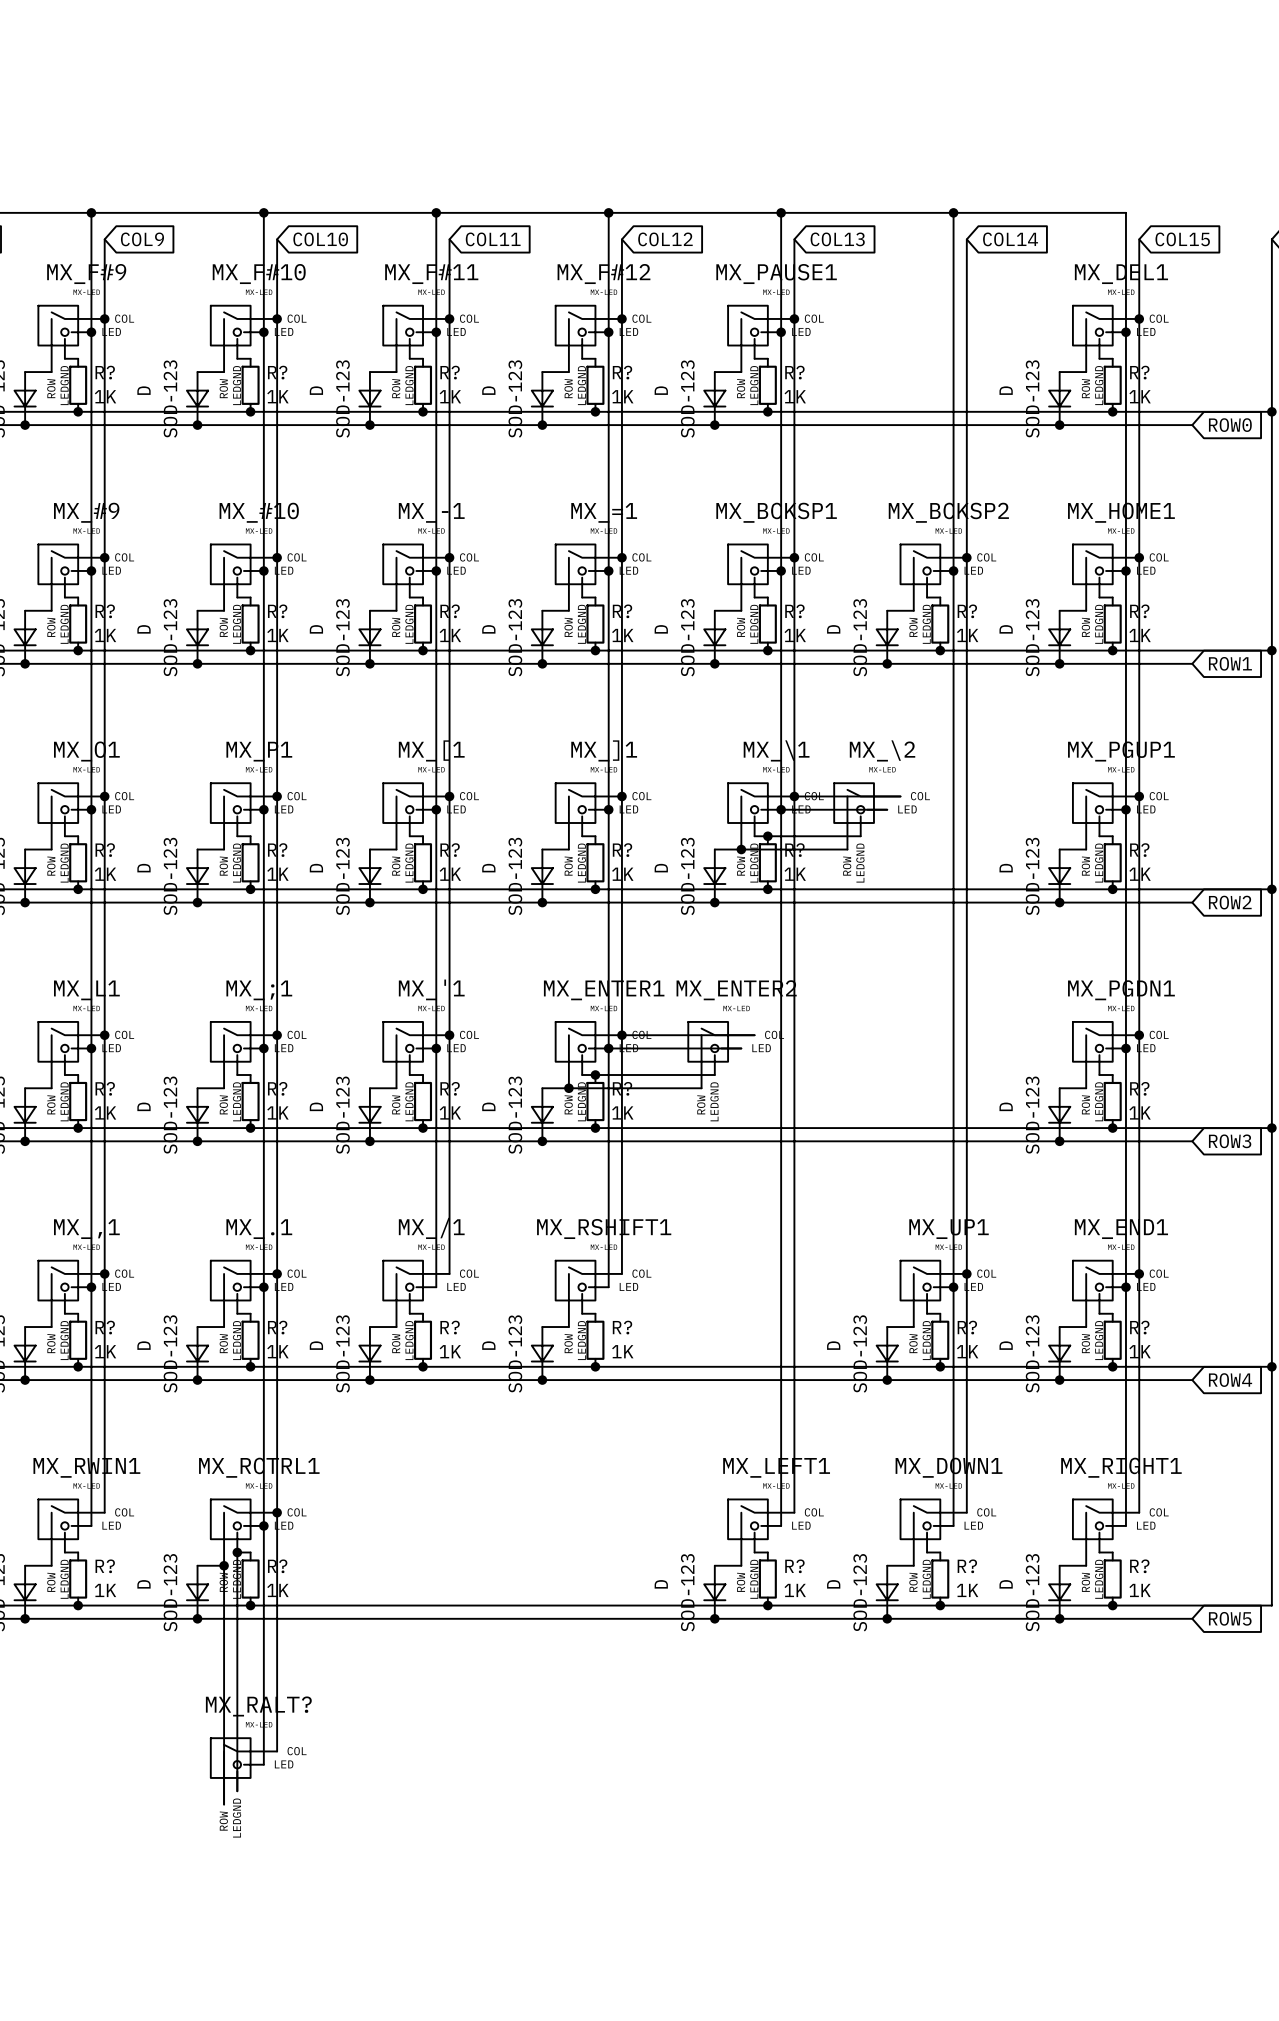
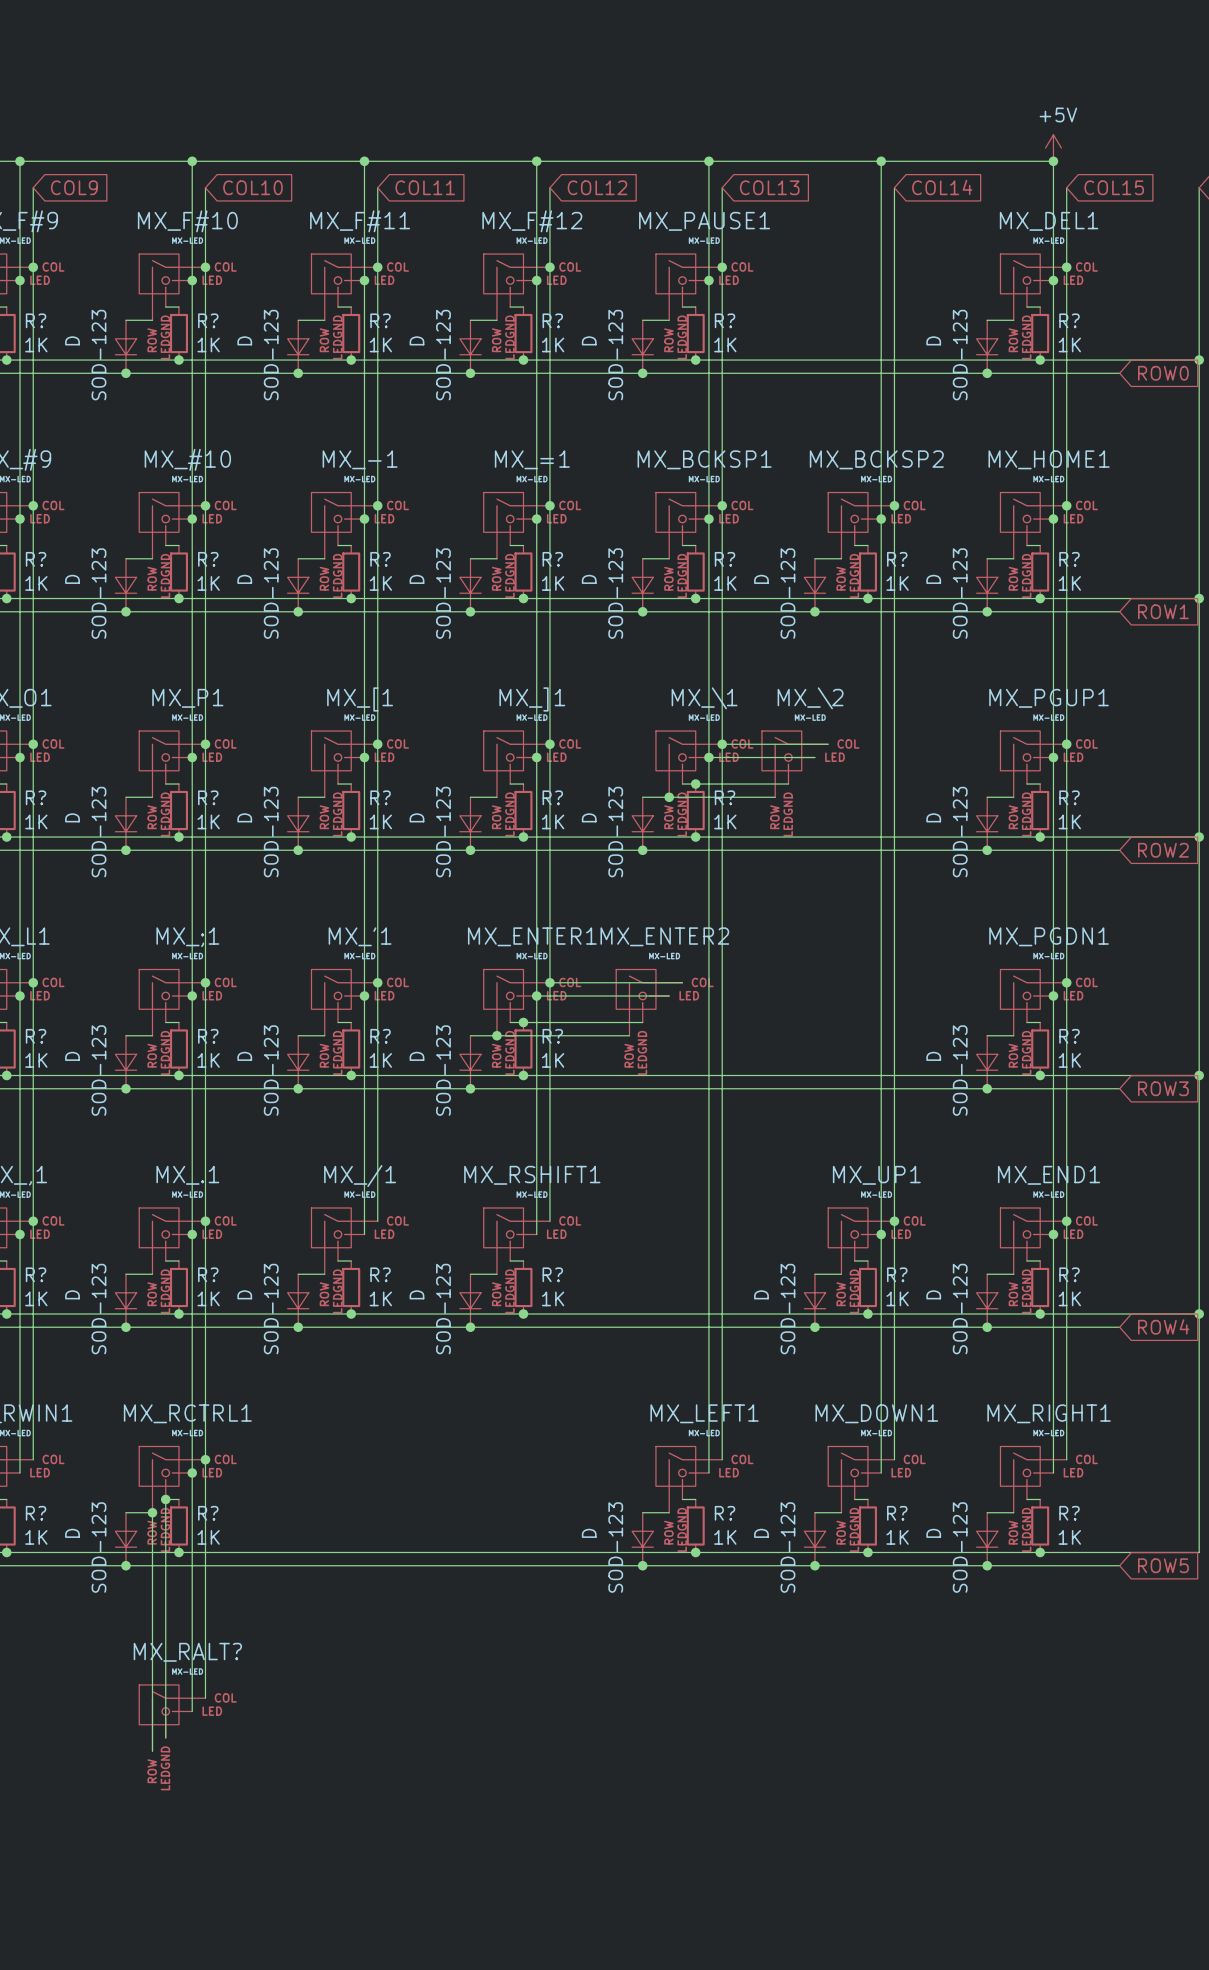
power symbol: none -> +5V (1053, 148)
junction: none -> (1053, 161)

